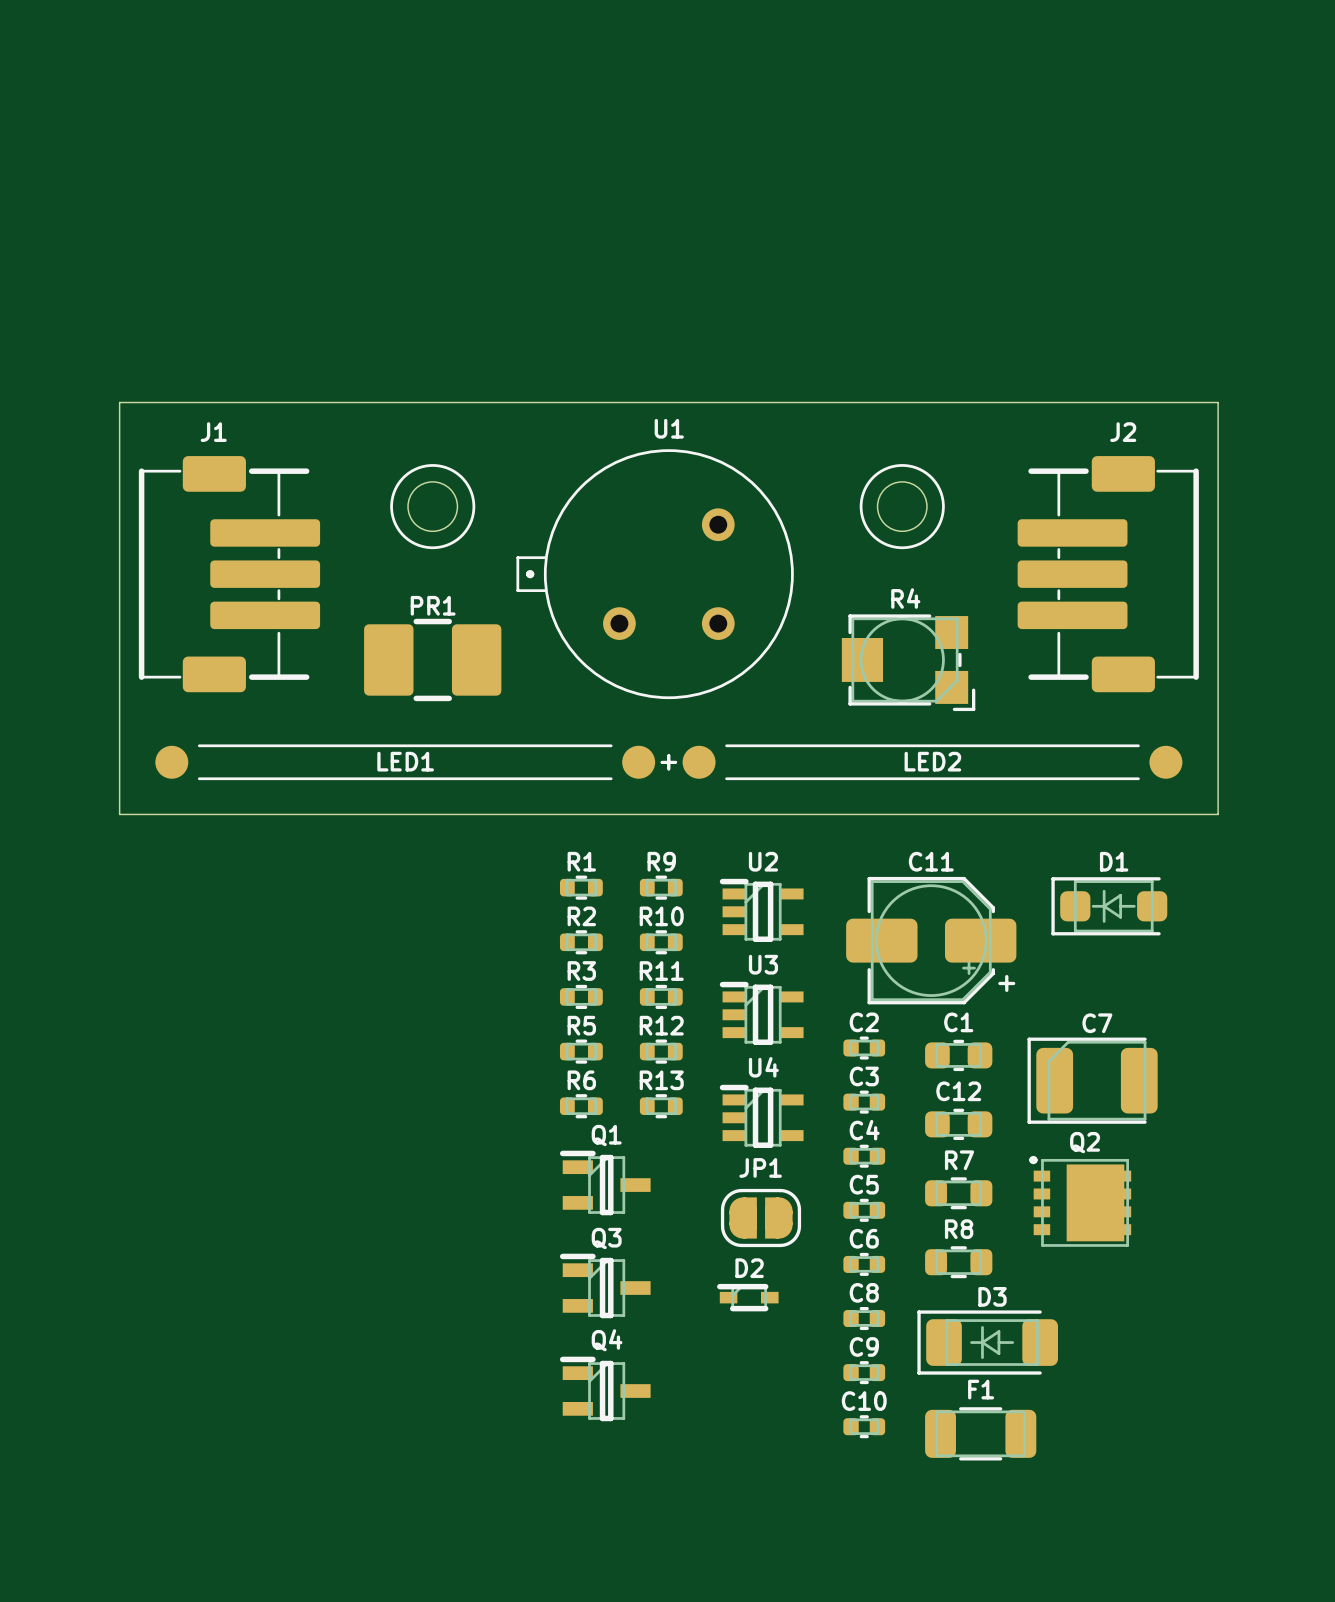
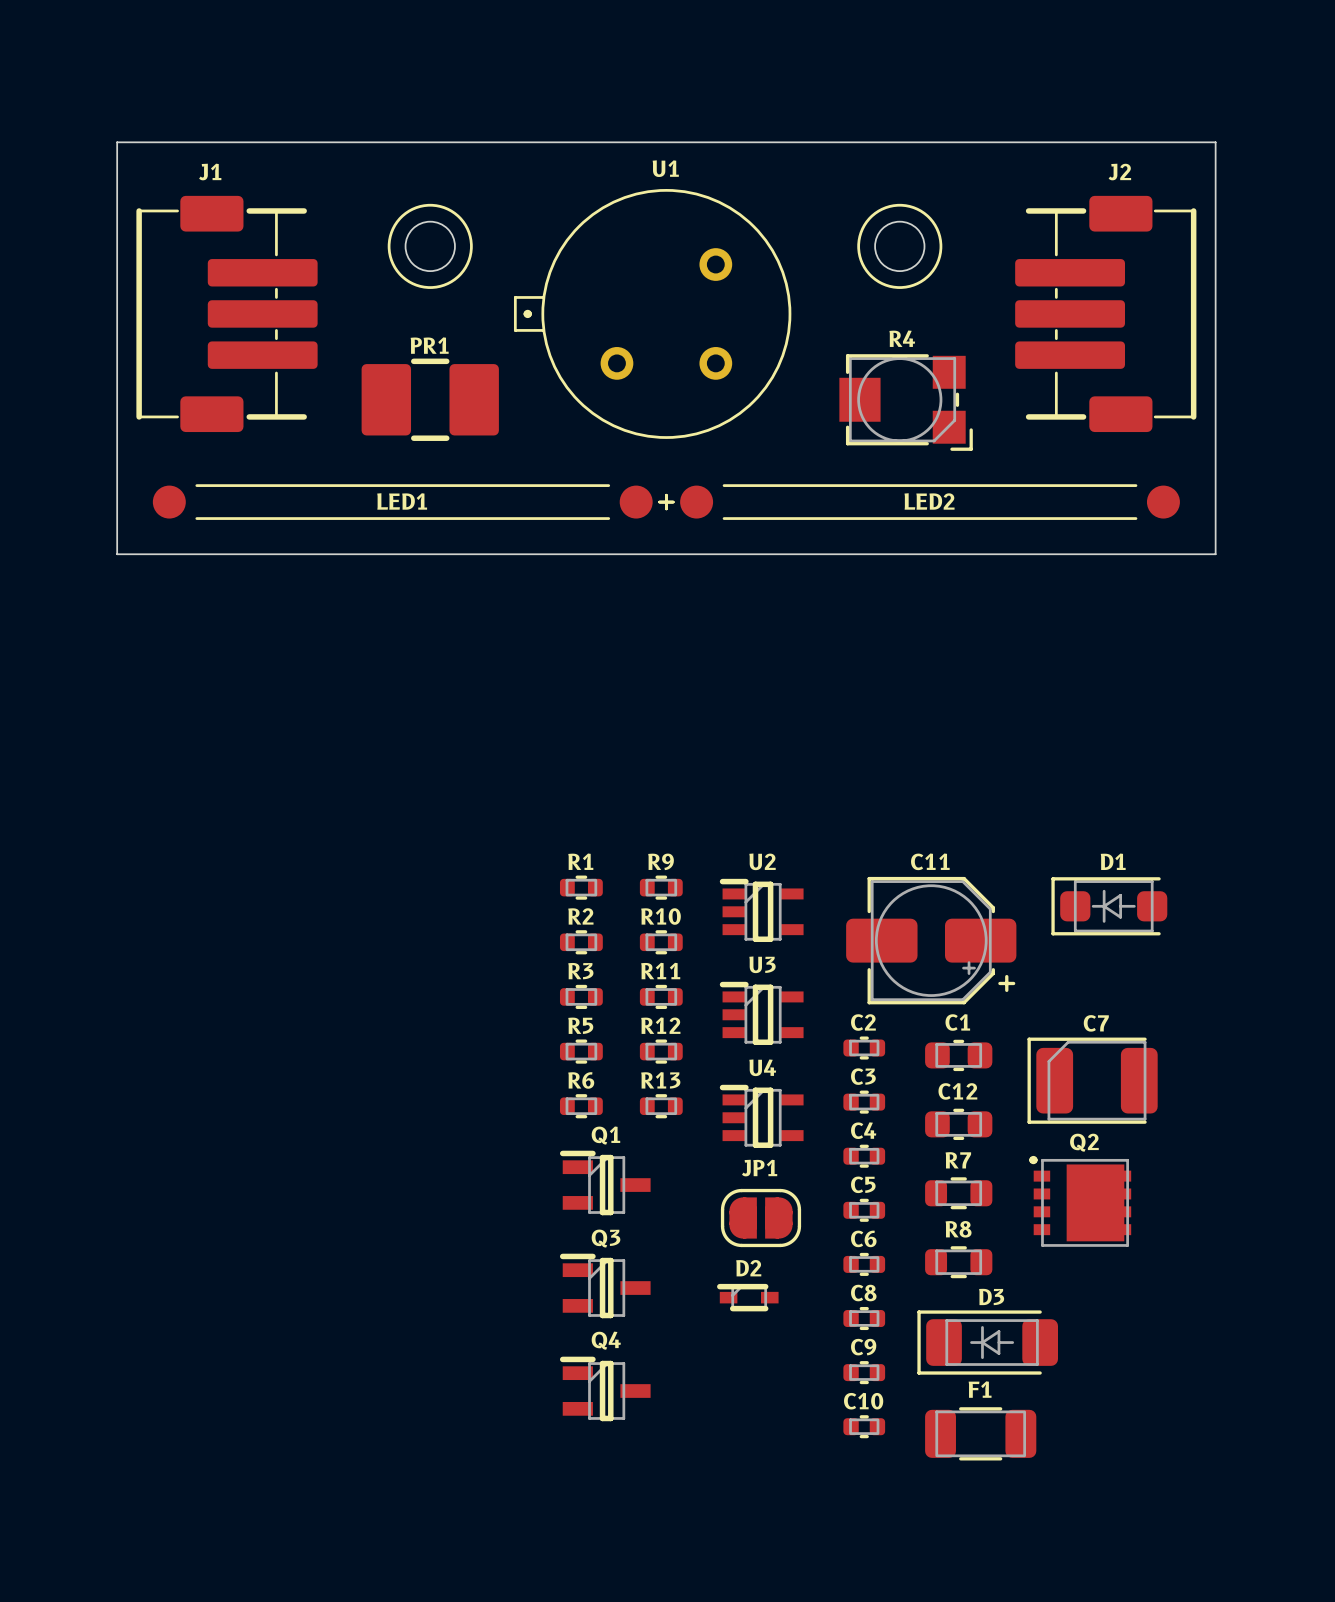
board edge: (119, 402) (119, 814) (1218, 814) (1218, 402) (119, 402) -> (117, 142) (117, 554) (1215, 554) (1215, 142) (117, 142)
drawing position: (432, 506) -> (430, 246)
round board edge position: (432, 506) -> (430, 246)
drawing position: (902, 506) -> (899, 246)
round board edge position: (902, 506) -> (899, 246)
J1 position: (229, 574) -> (227, 313)
U1 position: (655, 574) -> (652, 313)
J2 position: (1108, 574) -> (1105, 313)
PR1 position: (432, 659) -> (430, 399)
R4 position: (908, 662) -> (906, 402)
LED1 position: (416, 762) -> (413, 502)
LED2 position: (921, 762) -> (919, 502)

